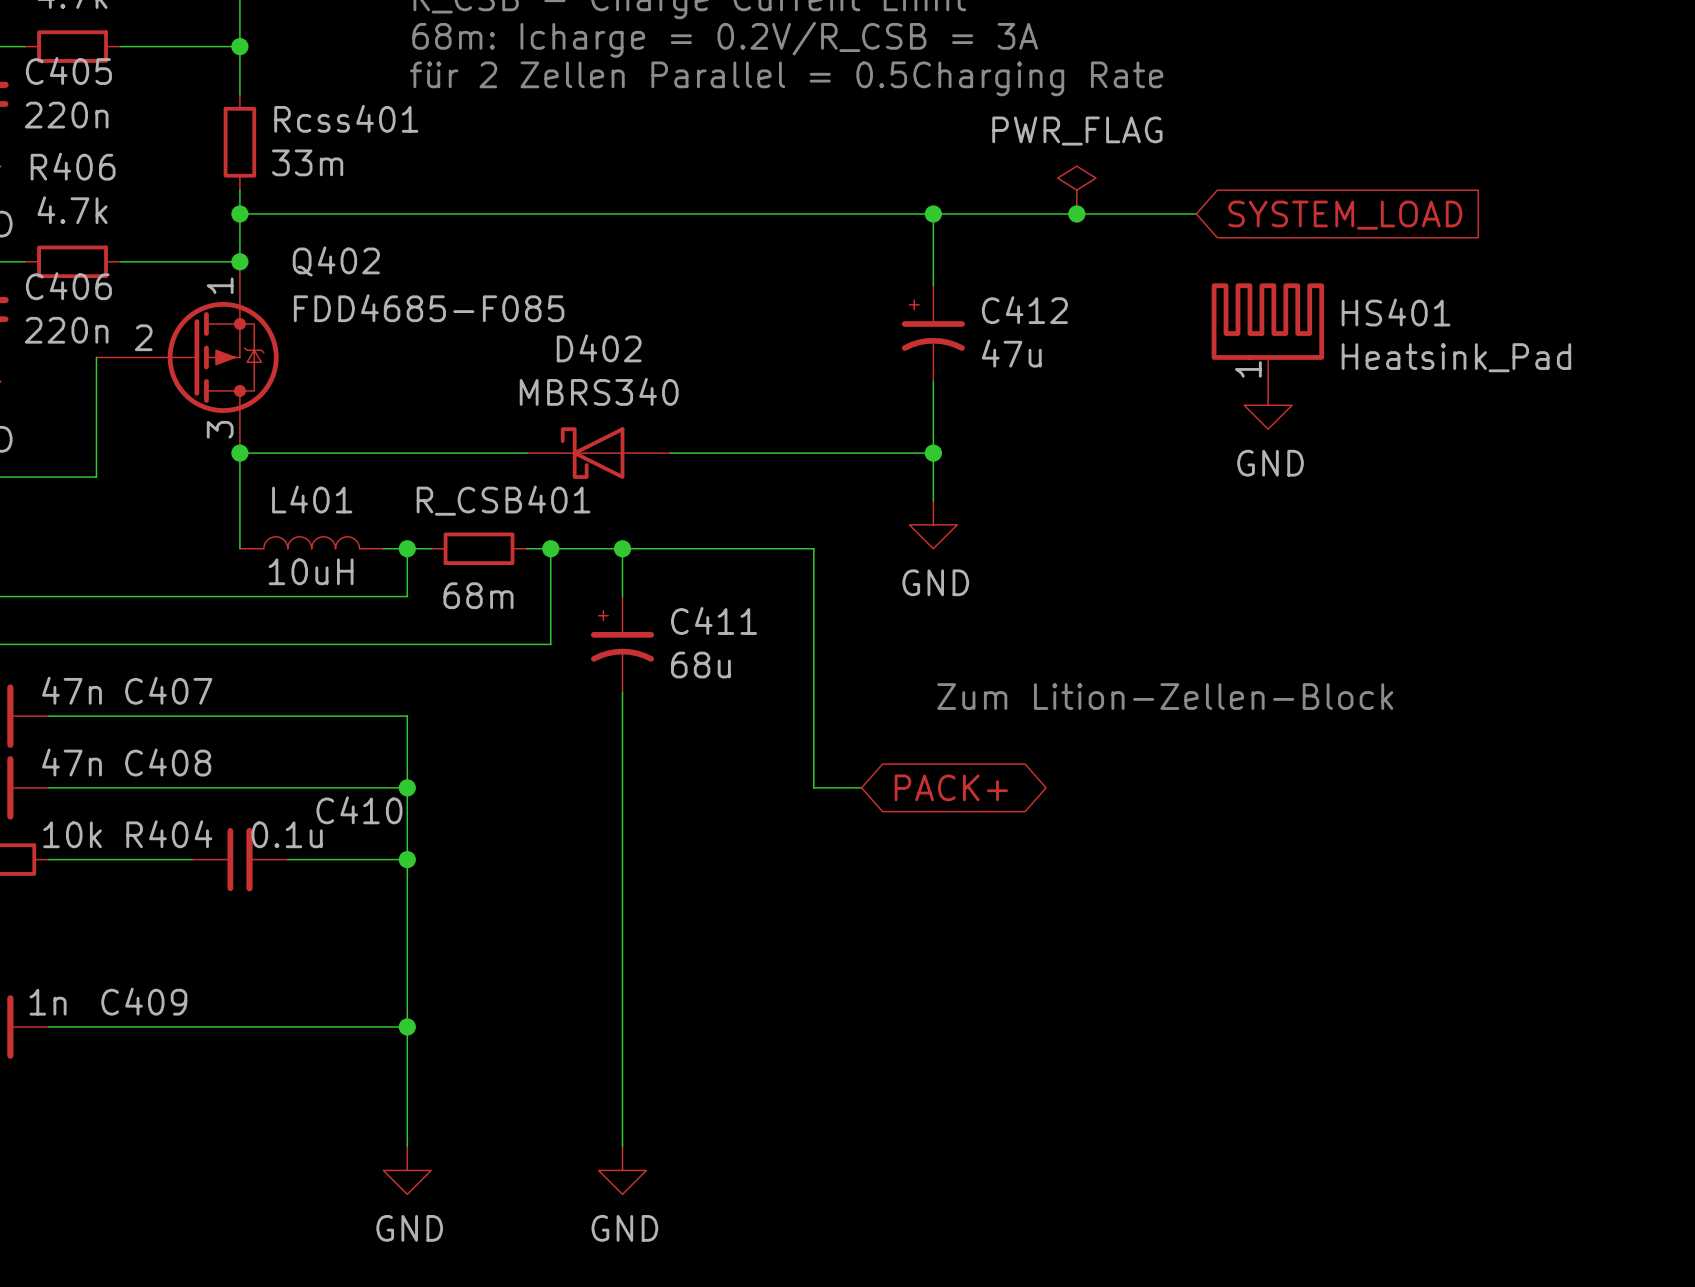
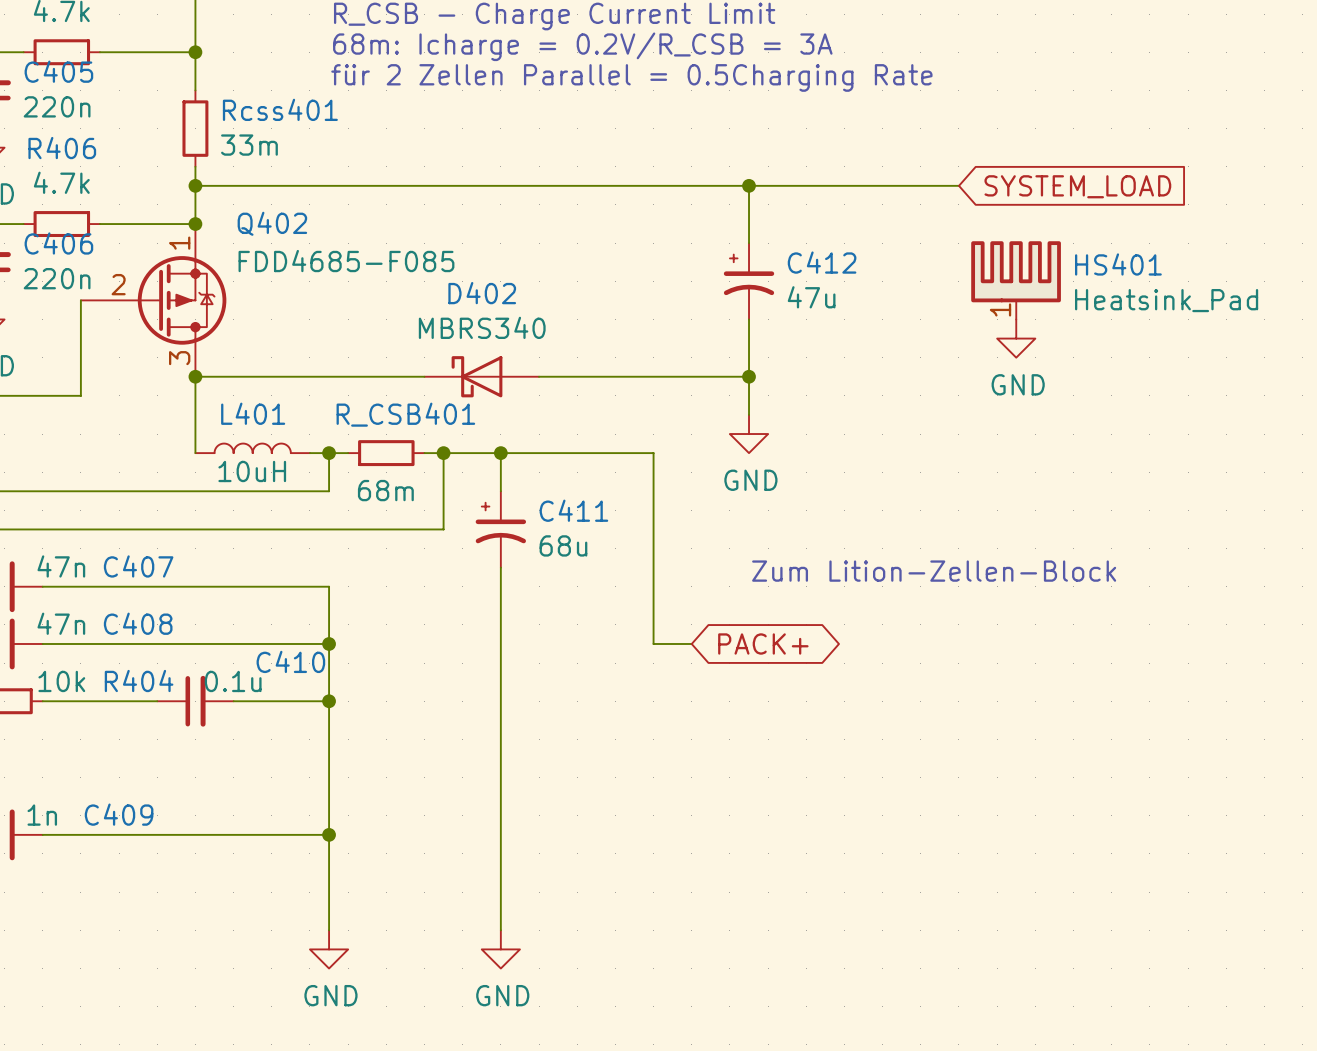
power symbol: PWR_FLAG (1076, 190) -> none
junction: (1076, 213) -> none

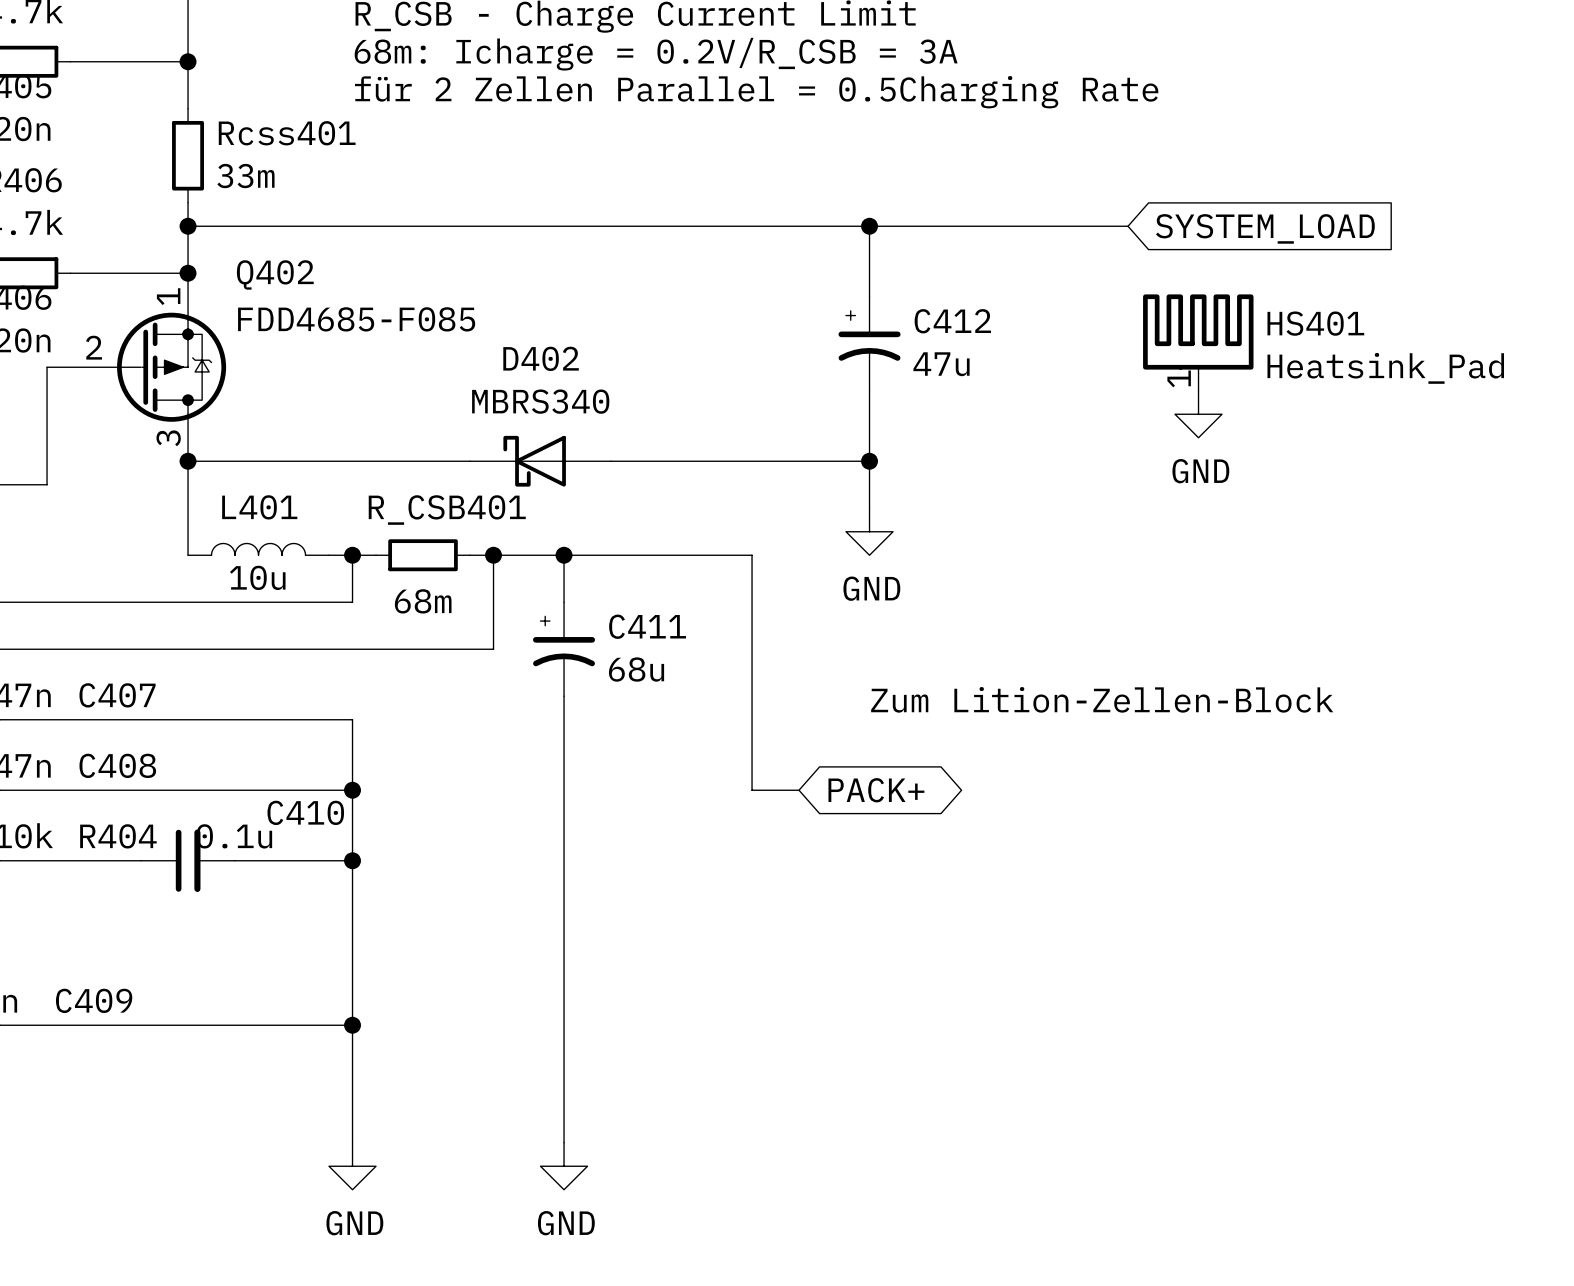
L401 value: 10uH (252, 471) -> 10u (257, 577)

